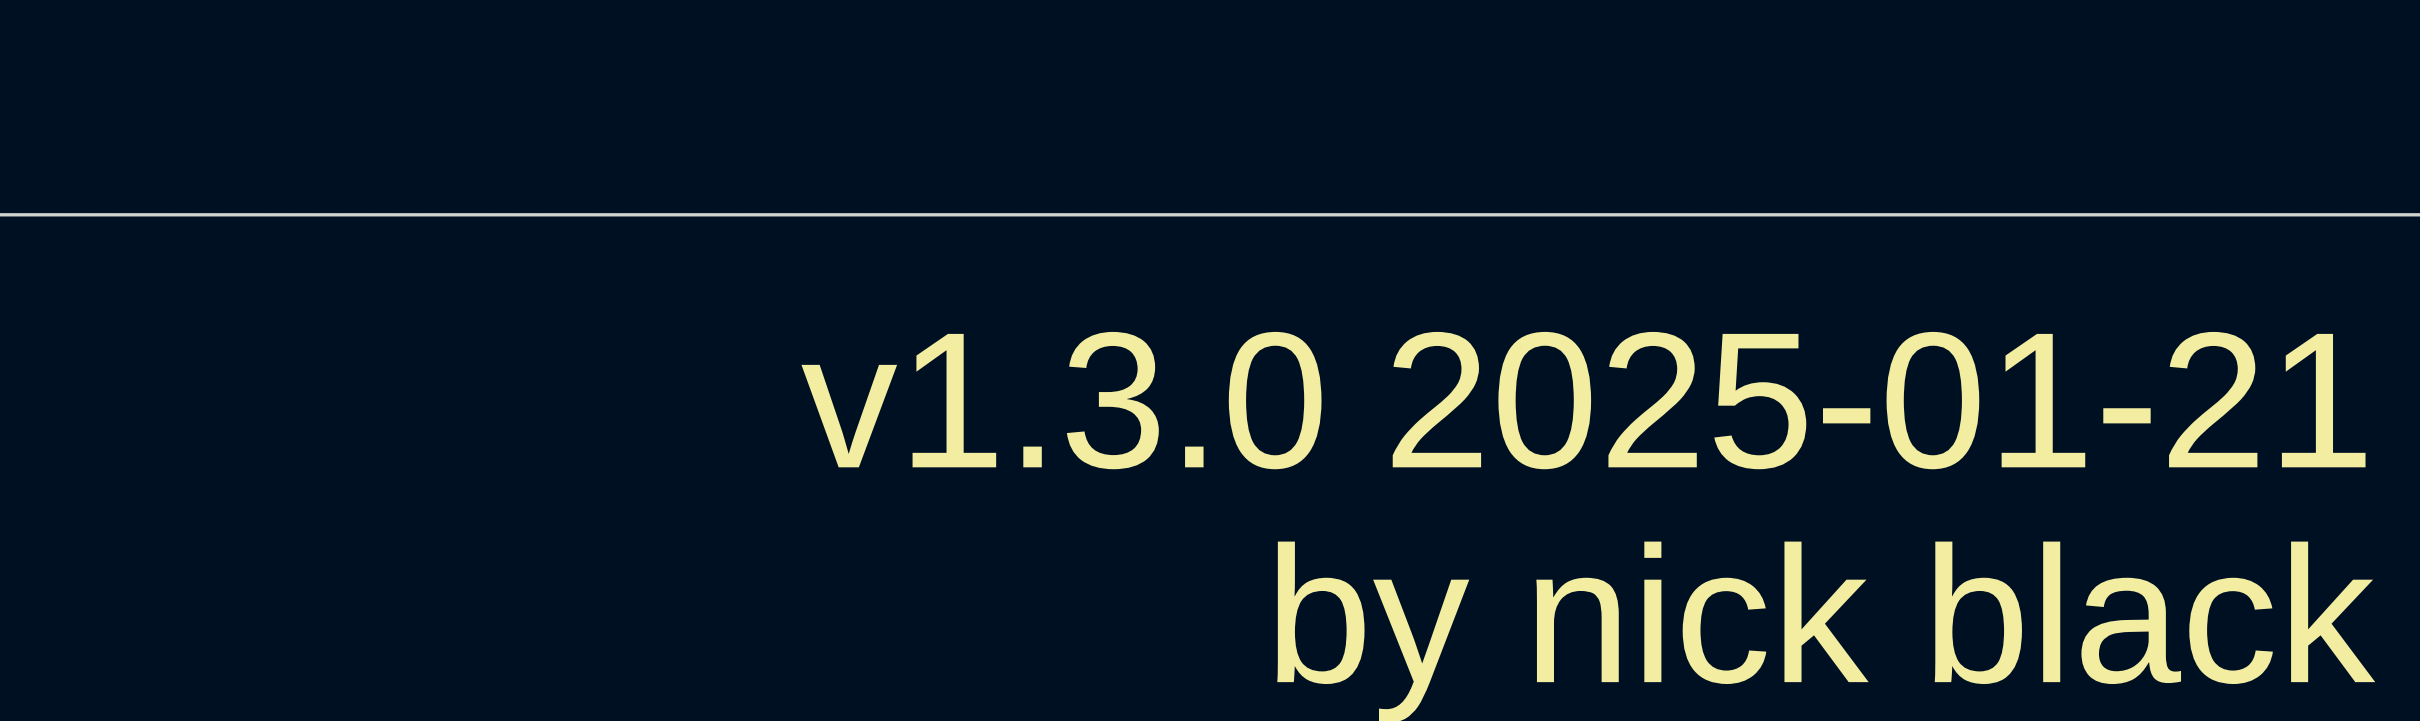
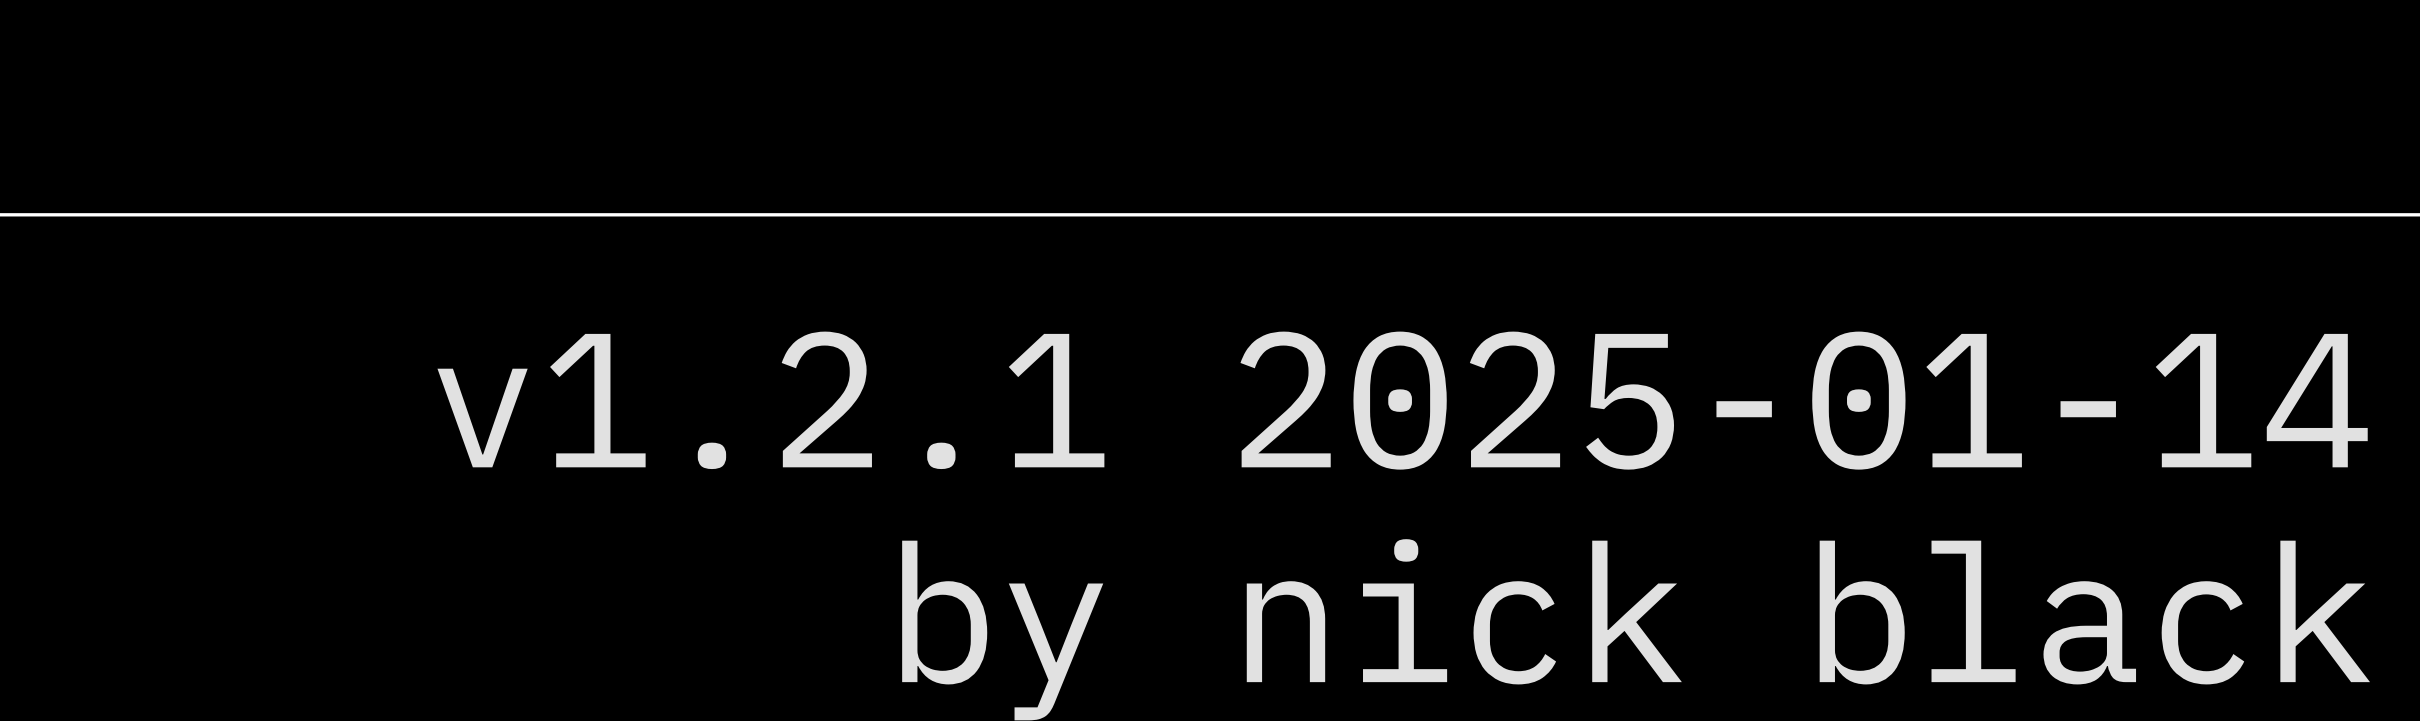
text: v1.3.0 2025-01-21 (1583, 400) -> v1.2.1 2025-01-14 (1402, 400)

